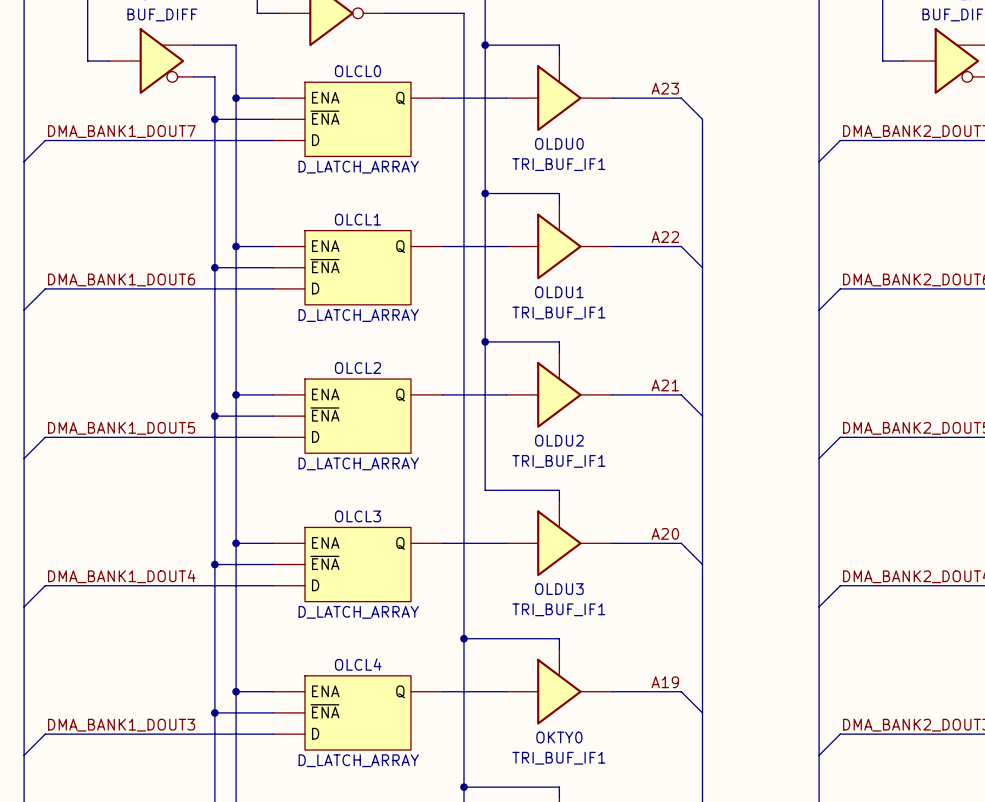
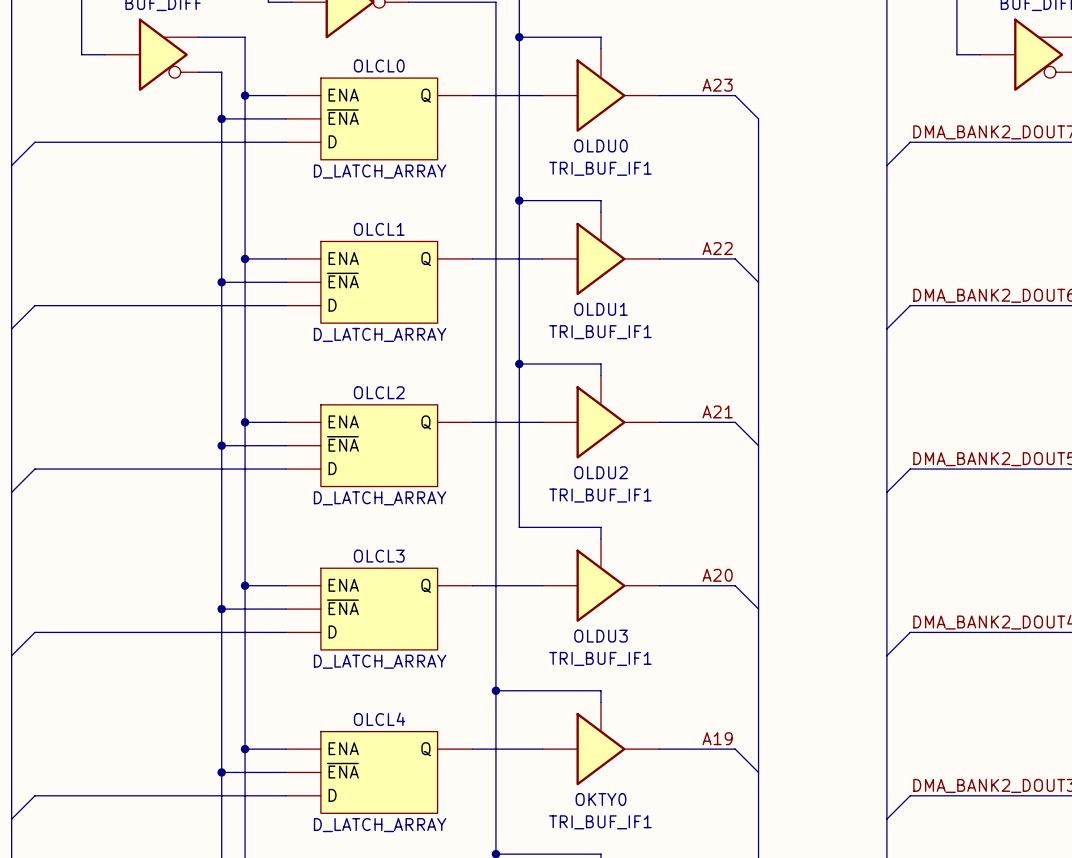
label: DMA_BANK1_DOUT7 (121, 131) -> none
label: DMA_BANK1_DOUT6 (121, 279) -> none
label: DMA_BANK1_DOUT5 (121, 428) -> none
label: DMA_BANK1_DOUT4 (121, 576) -> none
label: DMA_BANK1_DOUT3 (121, 725) -> none

